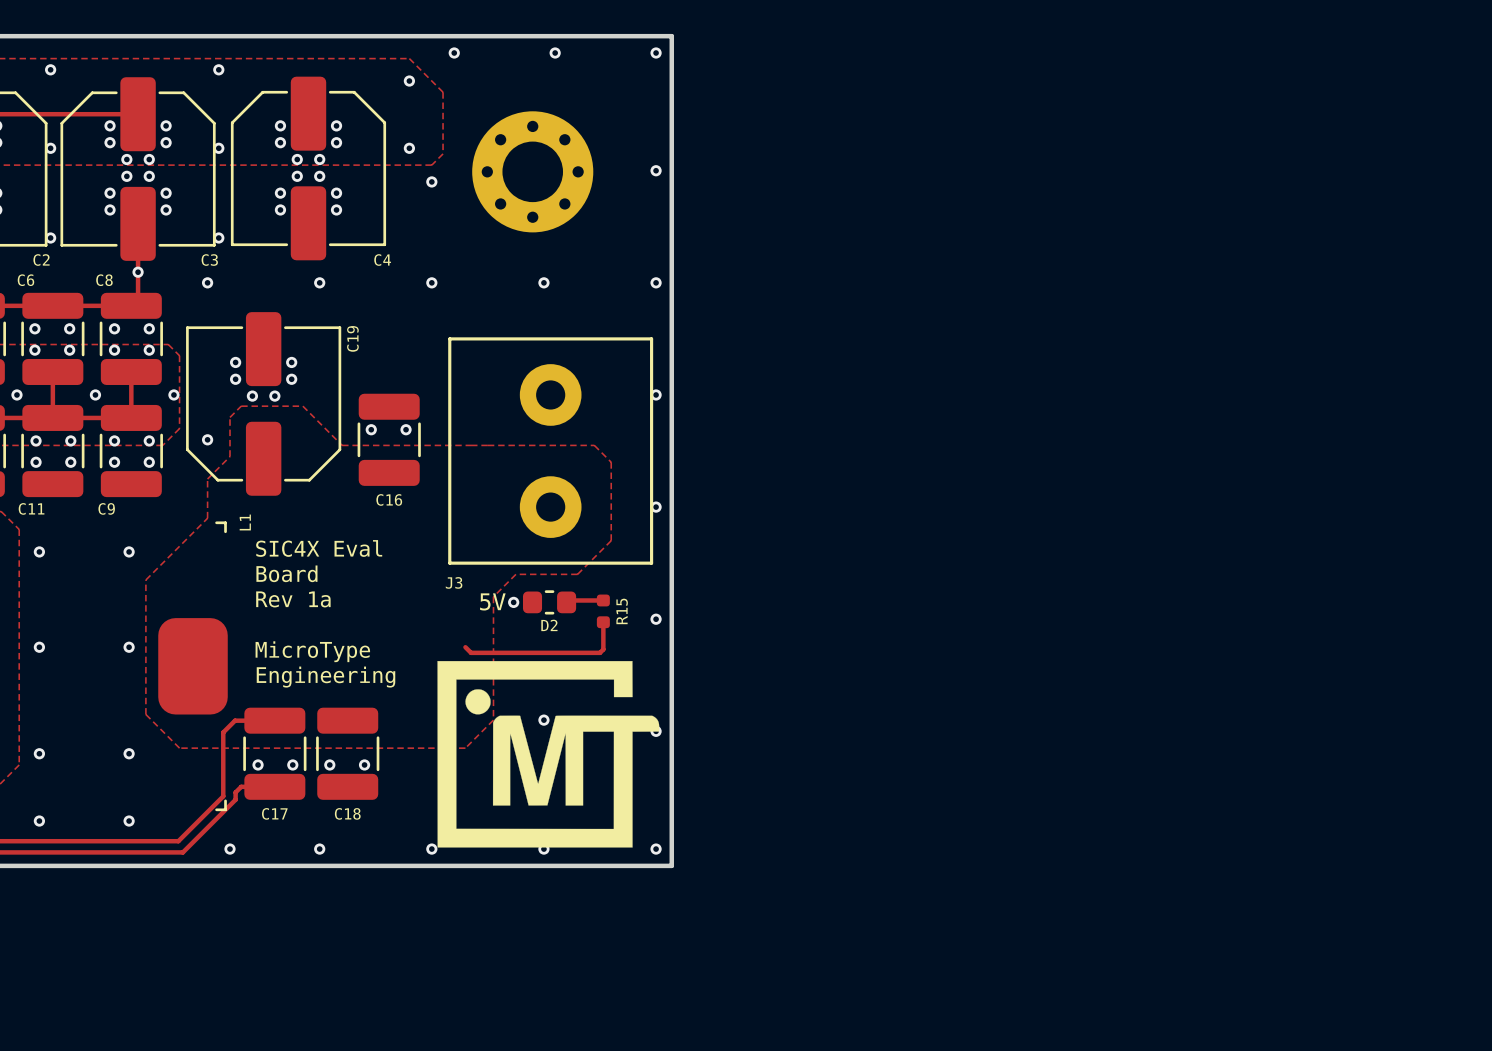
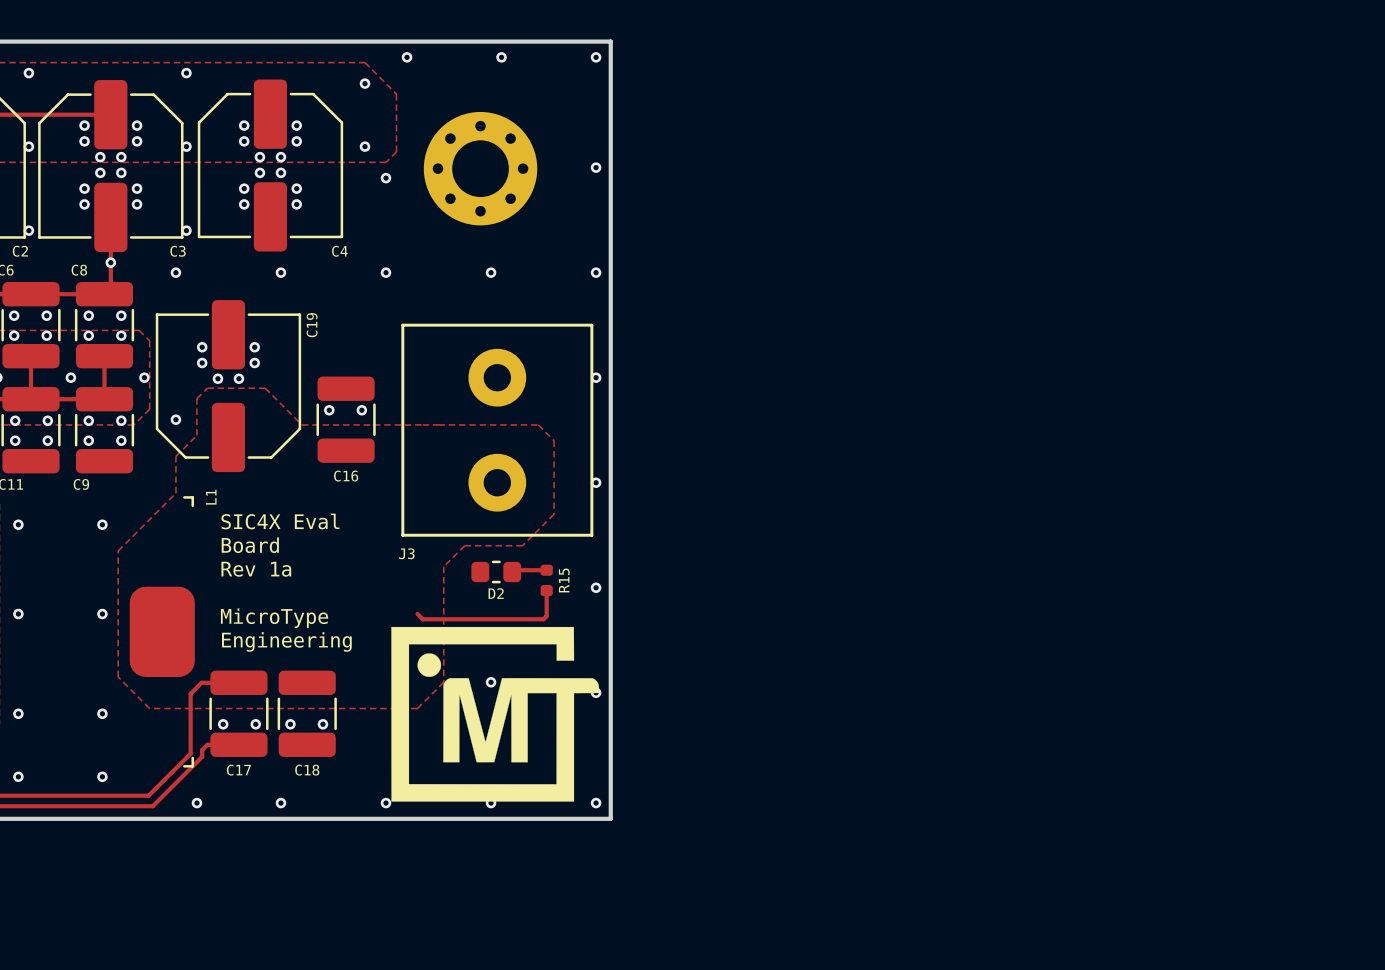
text: 5V (492, 601) -> none
via: (513, 602) -> none

